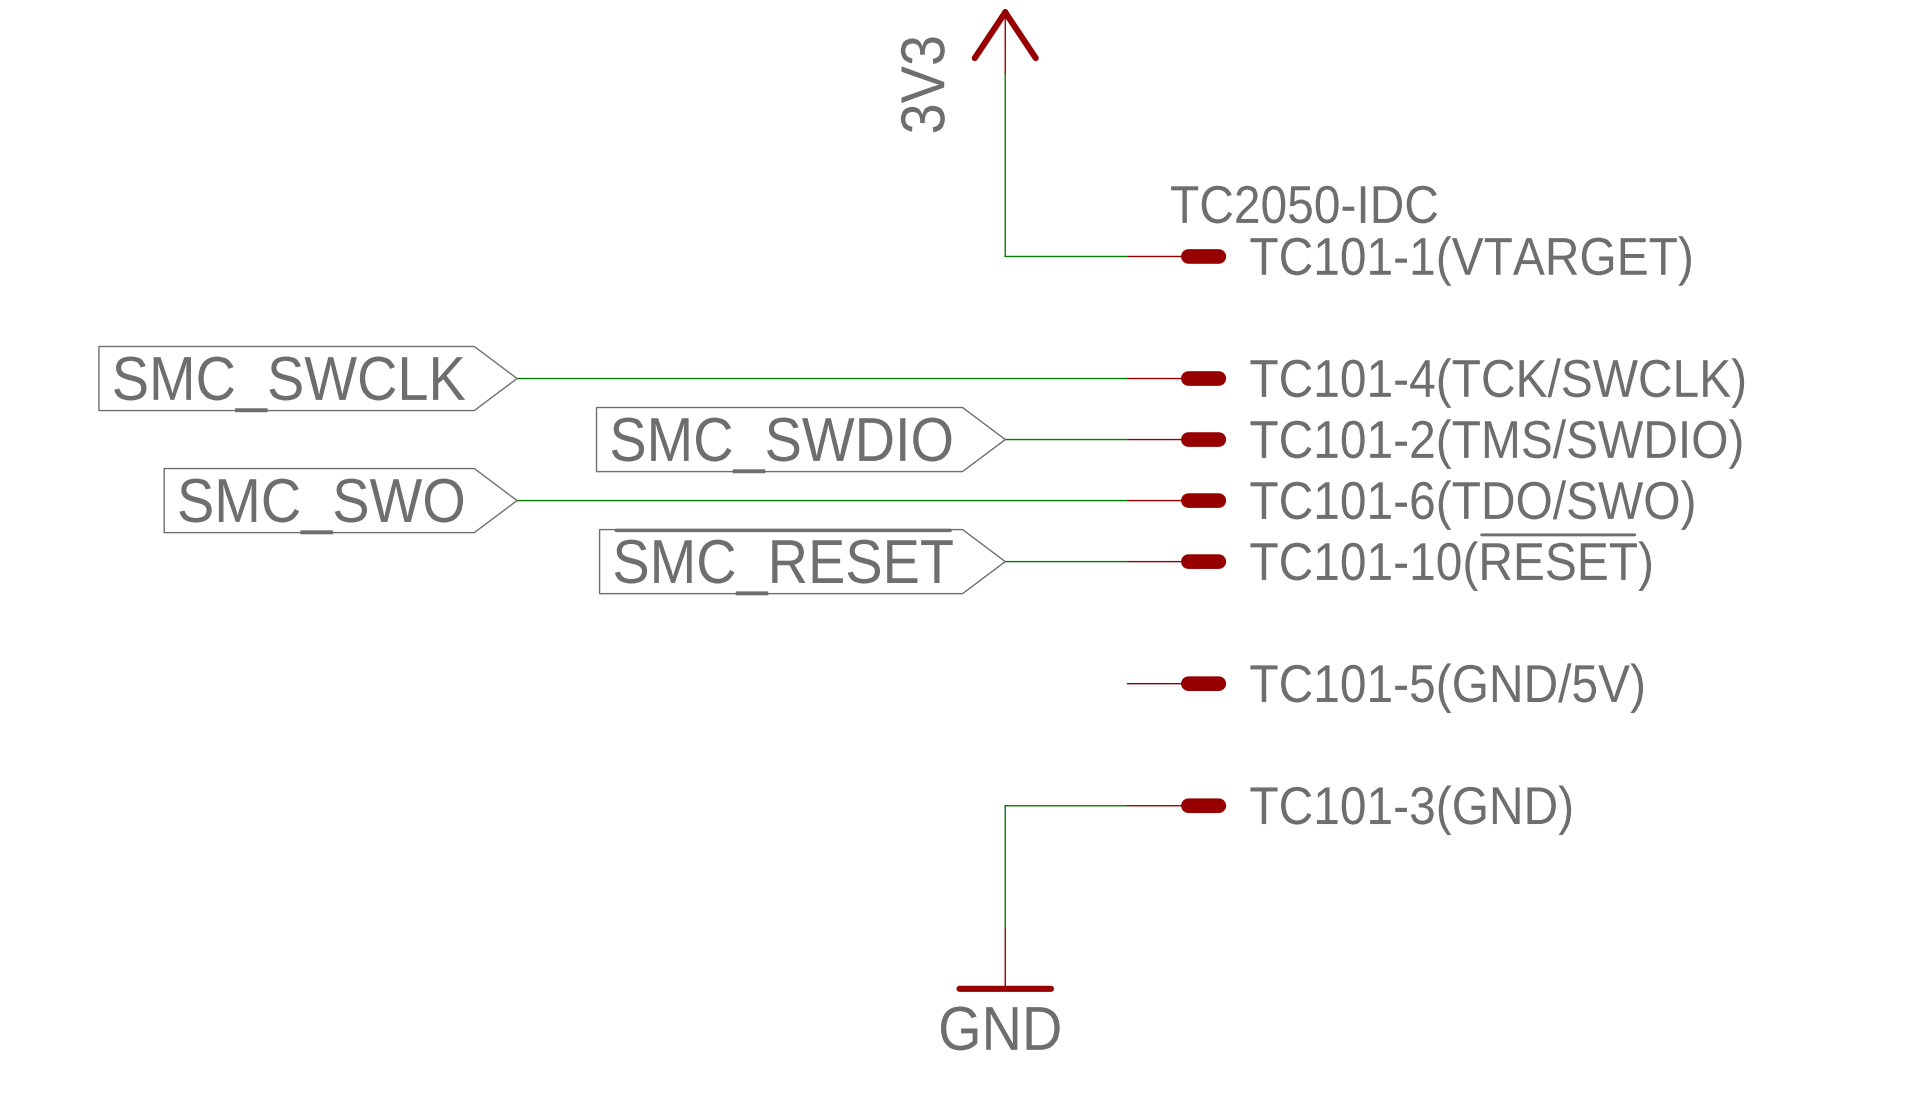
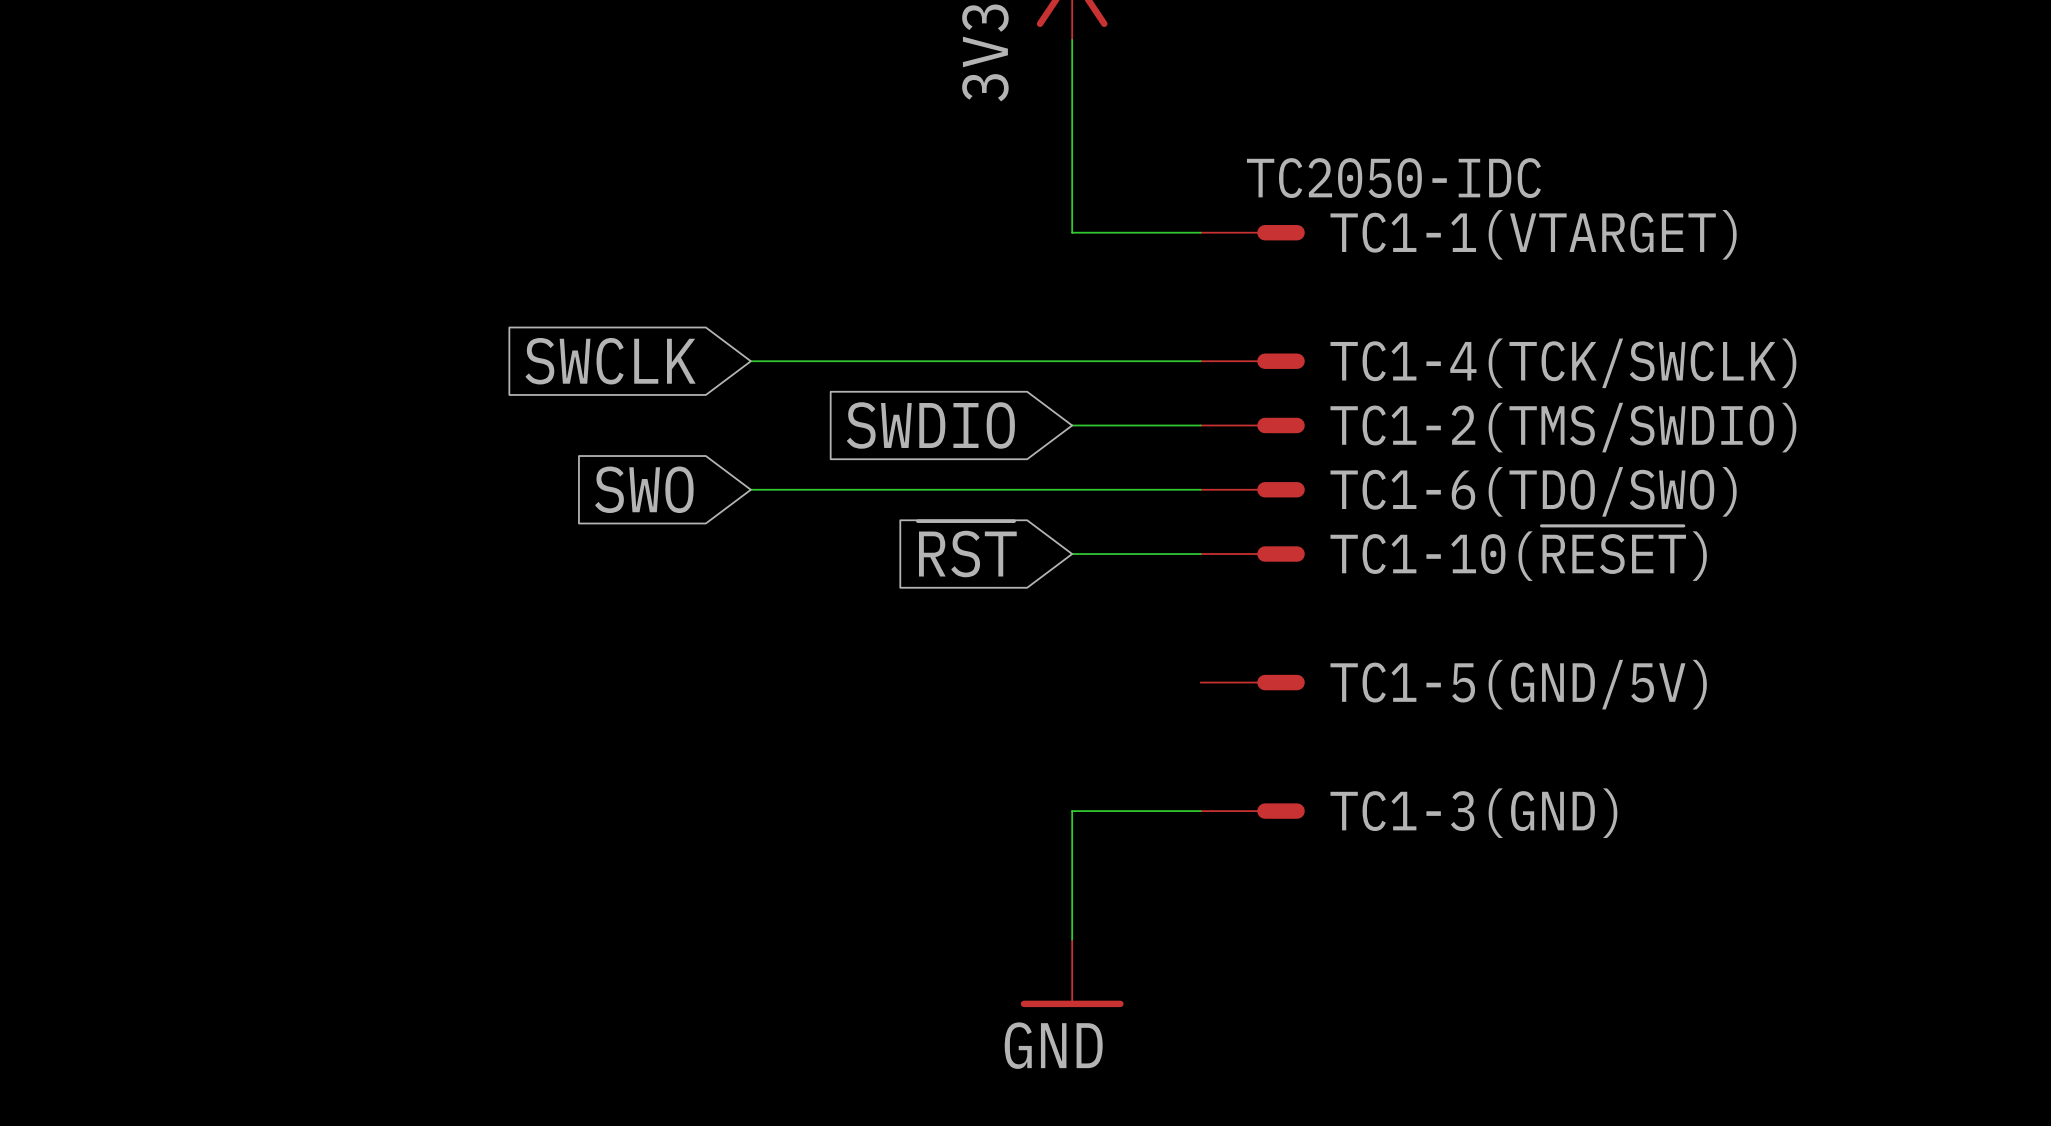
TC101-1(VTARGET) name: TC101-1(VTARGET) (1470, 261) -> TC1-1(VTARGET) (1533, 234)
wire: (517, 378) (700, 378) -> none
TC101-4(TCK/SWCLK) name: TC101-4(TCK/SWCLK) (1497, 383) -> TC1-4(TCK/SWCLK) (1563, 363)
global label: SMC_SWCLK (289, 384) -> SWCLK (610, 361)
TC101-2(TMS/SWDIO) name: TC101-2(TMS/SWDIO) (1495, 444) -> TC1-2(TMS/SWDIO) (1563, 427)
global label: SMC_SWDIO (781, 445) -> SWDIO (930, 425)
wire: (517, 500) (700, 500) -> none
global label: none -> SWO (644, 489)
TC101-6(TDO/SWO) name: TC101-6(TDO/SWO) (1471, 505) -> TC1-6(TDO/SWO) (1533, 491)
global label: SMC_SWO (321, 506) -> none
global label: ~{SMC_RESET} (783, 562) -> ~{RST} (967, 549)
TC101-10(~{RESET}) name: TC101-10(~{RESET}) (1450, 562) -> TC1-10(~{RESET}) (1518, 553)
TC101-5(GND/5V) name: TC101-5(GND/5V) (1446, 688) -> TC1-5(GND/5V) (1518, 684)
TC101-3(GND) name: TC101-3(GND) (1410, 810) -> TC1-3(GND) (1473, 813)

